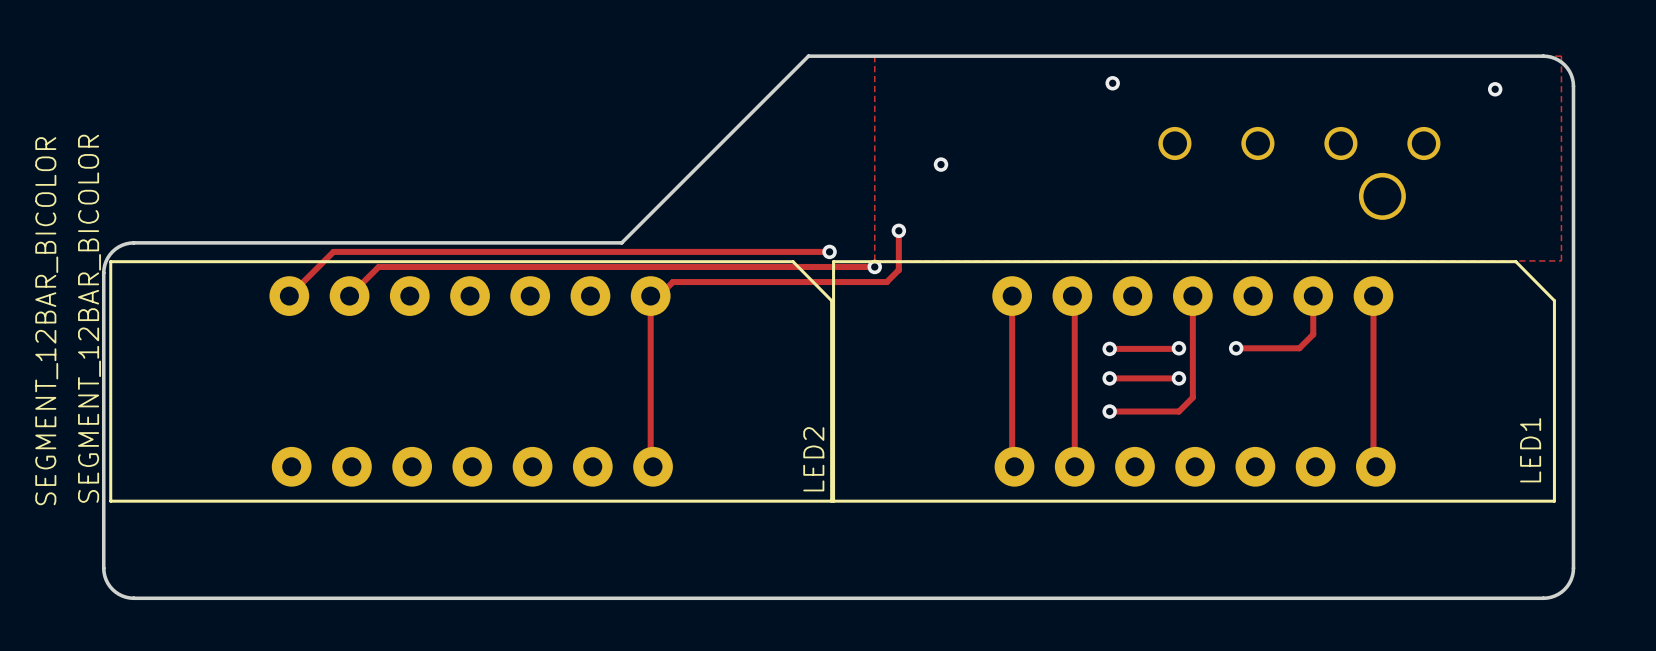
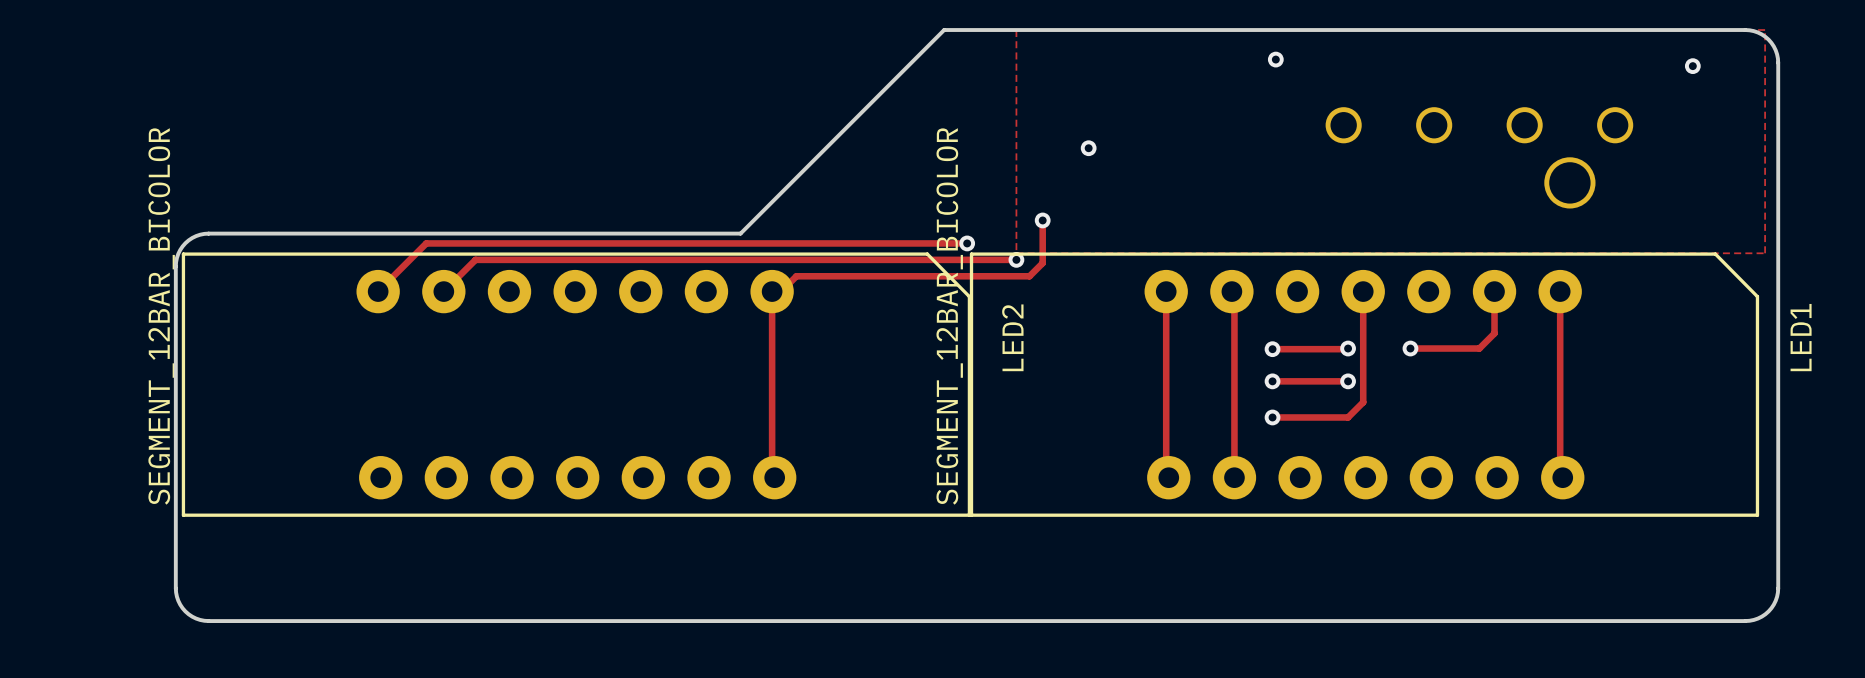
LED1 value position: SEGMENT_12BAR_BICOLOR (46, 321) -> SEGMENT_12BAR_BICOLOR (949, 316)
LED1 name position: LED1 (1530, 450) -> LED1 (1801, 337)
LED2 name position: LED2 (813, 459) -> LED2 (1012, 337)

